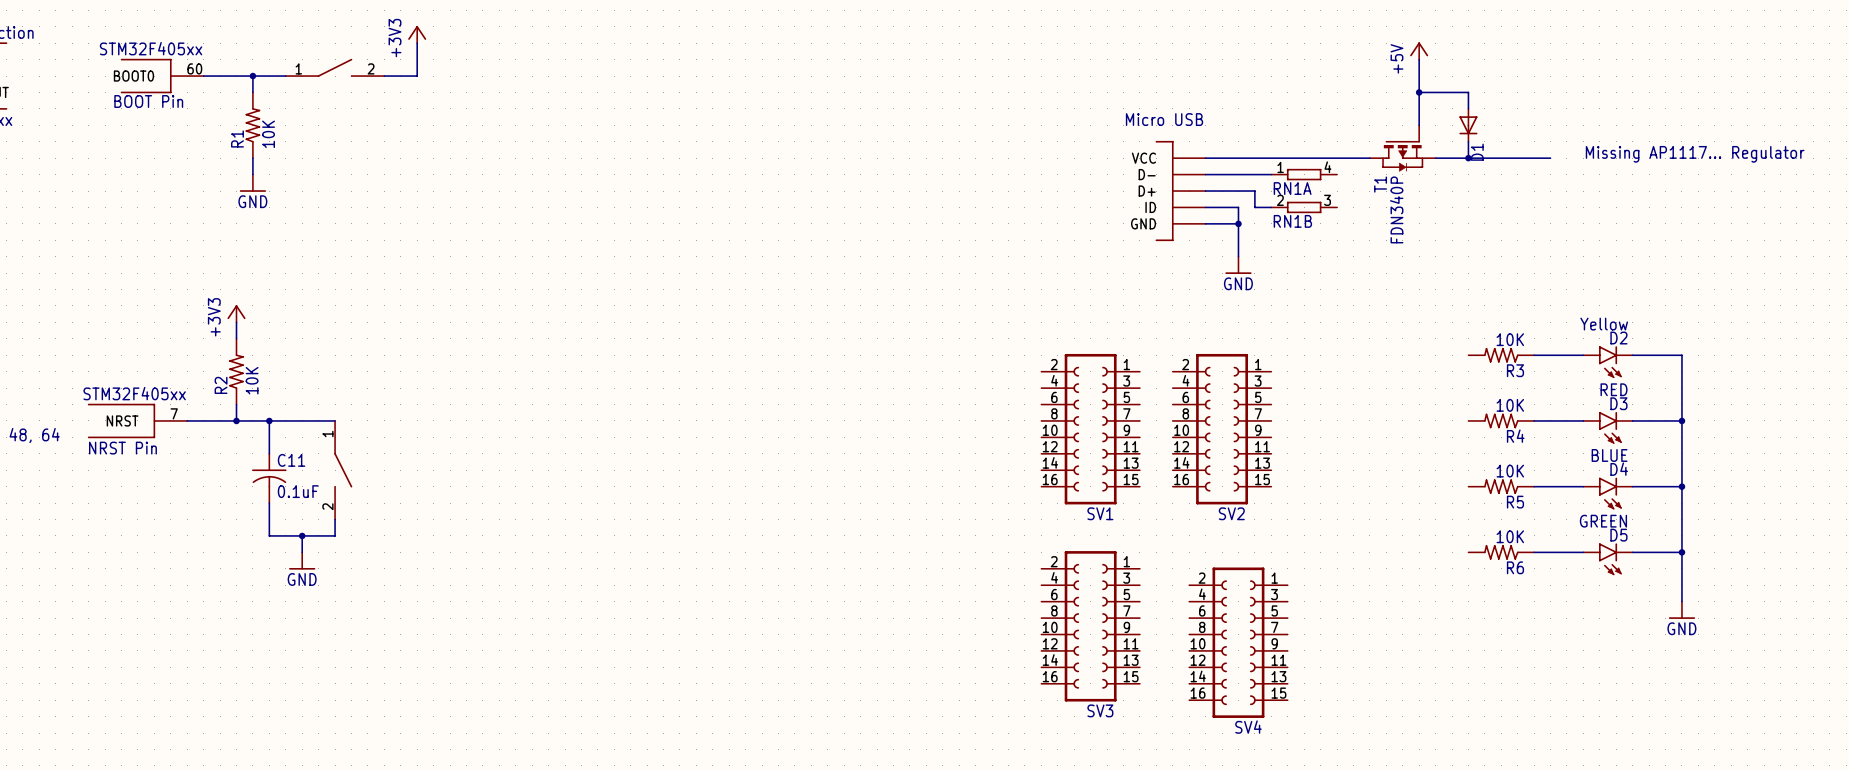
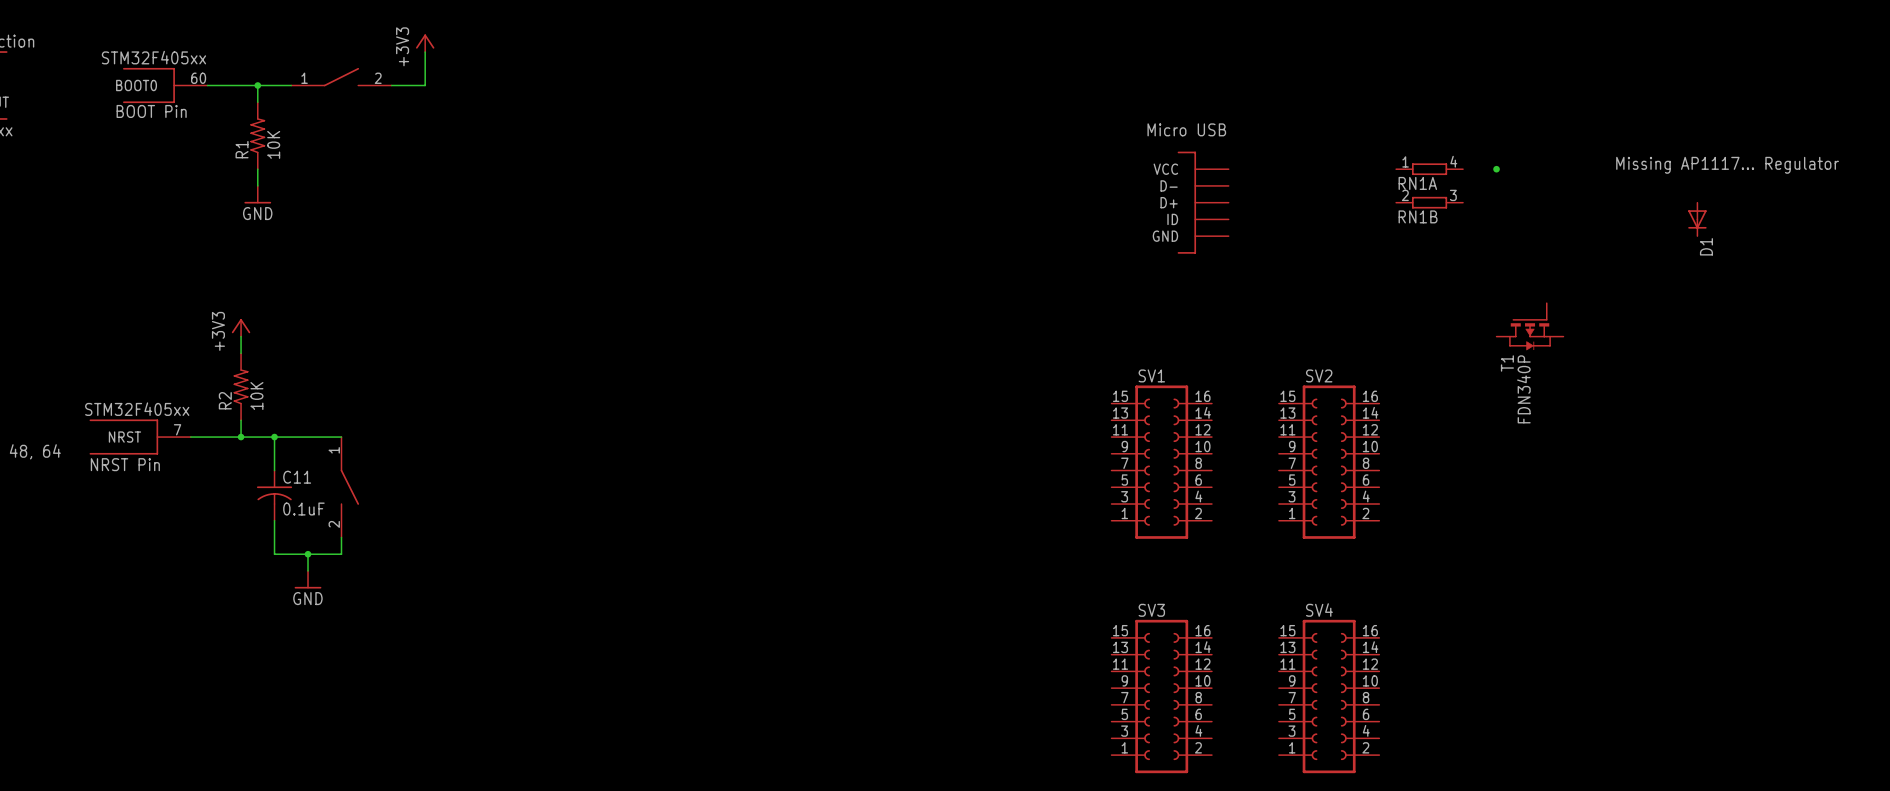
power symbol: +5V (1419, 50) -> none
wire: (1419, 59) (1419, 125) -> none
wire: (1419, 92) (1468, 92) (1468, 108) -> none
junction: (1419, 92) -> none
D1 position: (1468, 125) -> (1697, 219)
wire: (1468, 141) (1468, 158) -> none
T1 position: (1402, 148) -> (1530, 326)
wire: (1205, 158) (1369, 158) -> none
wire: (1435, 158) (1550, 158) -> none
wire: (1205, 174) (1271, 174) -> none
RN1A position: (1304, 174) -> (1429, 169)
wire: (1205, 191) (1254, 191) (1254, 207) (1271, 207) -> none
wire: (1205, 207) (1238, 207) (1238, 256) -> none
RN1B position: (1304, 207) -> (1429, 202)
wire: (1205, 223) (1238, 223) -> none
junction: (1238, 223) -> none
power symbol: GND (1238, 265) -> none
R3: 10K (1501, 355) -> none
wire: (1534, 355) (1583, 355) -> none
wire: (1632, 355) (1681, 355) (1681, 601) -> none
D2: Yellow (1608, 362) -> none
R4: 10K (1501, 420) -> none
wire: (1534, 420) (1583, 420) -> none
wire: (1632, 420) (1681, 420) -> none
junction: (1681, 420) -> none
D3: RED (1608, 427) -> none
SV1 rotation: 0° (1090, 429) -> 180° (1161, 462)
SV2 rotation: 0° (1222, 429) -> 180° (1329, 462)
R5: 10K (1501, 486) -> none
wire: (1534, 486) (1583, 486) -> none
wire: (1632, 486) (1681, 486) -> none
junction: (1681, 486) -> none
D4: BLUE (1608, 493) -> none
R6: 10K (1501, 552) -> none
wire: (1534, 552) (1583, 552) -> none
wire: (1632, 552) (1681, 552) -> none
junction: (1681, 552) -> none
D5: GREEN (1608, 559) -> none
power symbol: GND (1681, 610) -> none
SV3 rotation: 0° (1090, 626) -> 180° (1161, 696)
SV4 rotation: 0° (1238, 642) -> 180° (1329, 696)

